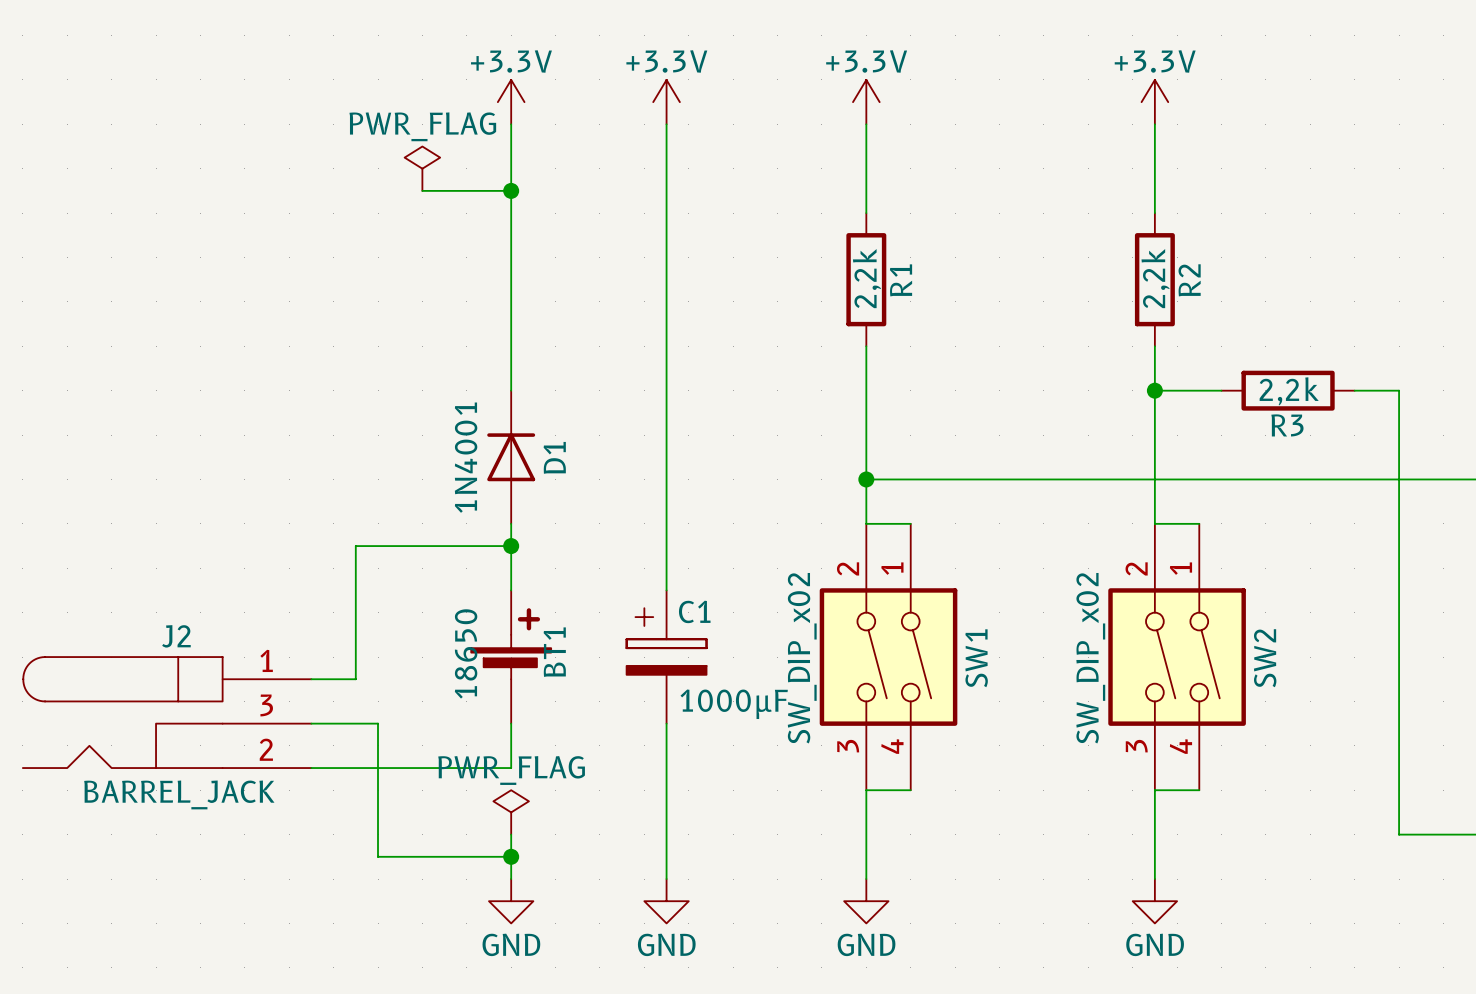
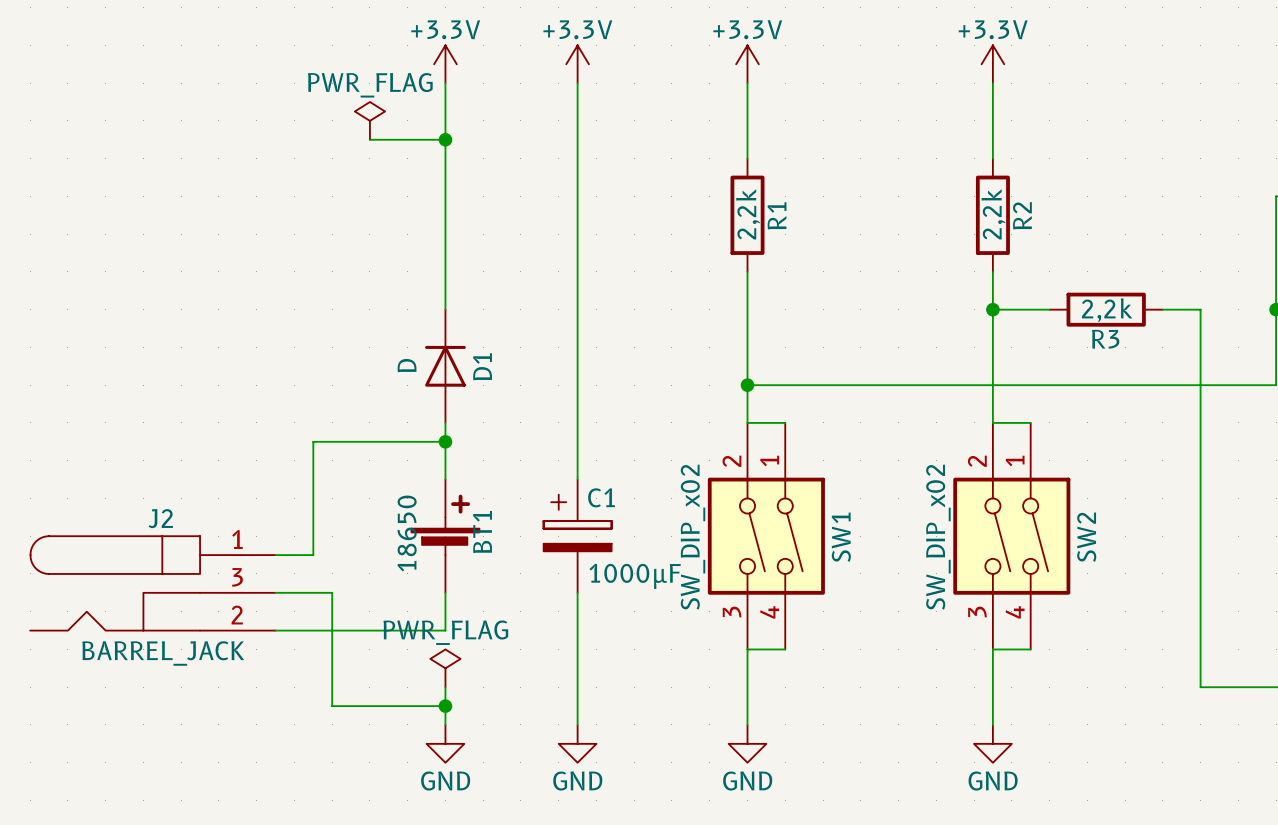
D1 value: 1N4001 (466, 457) -> D (407, 365)

